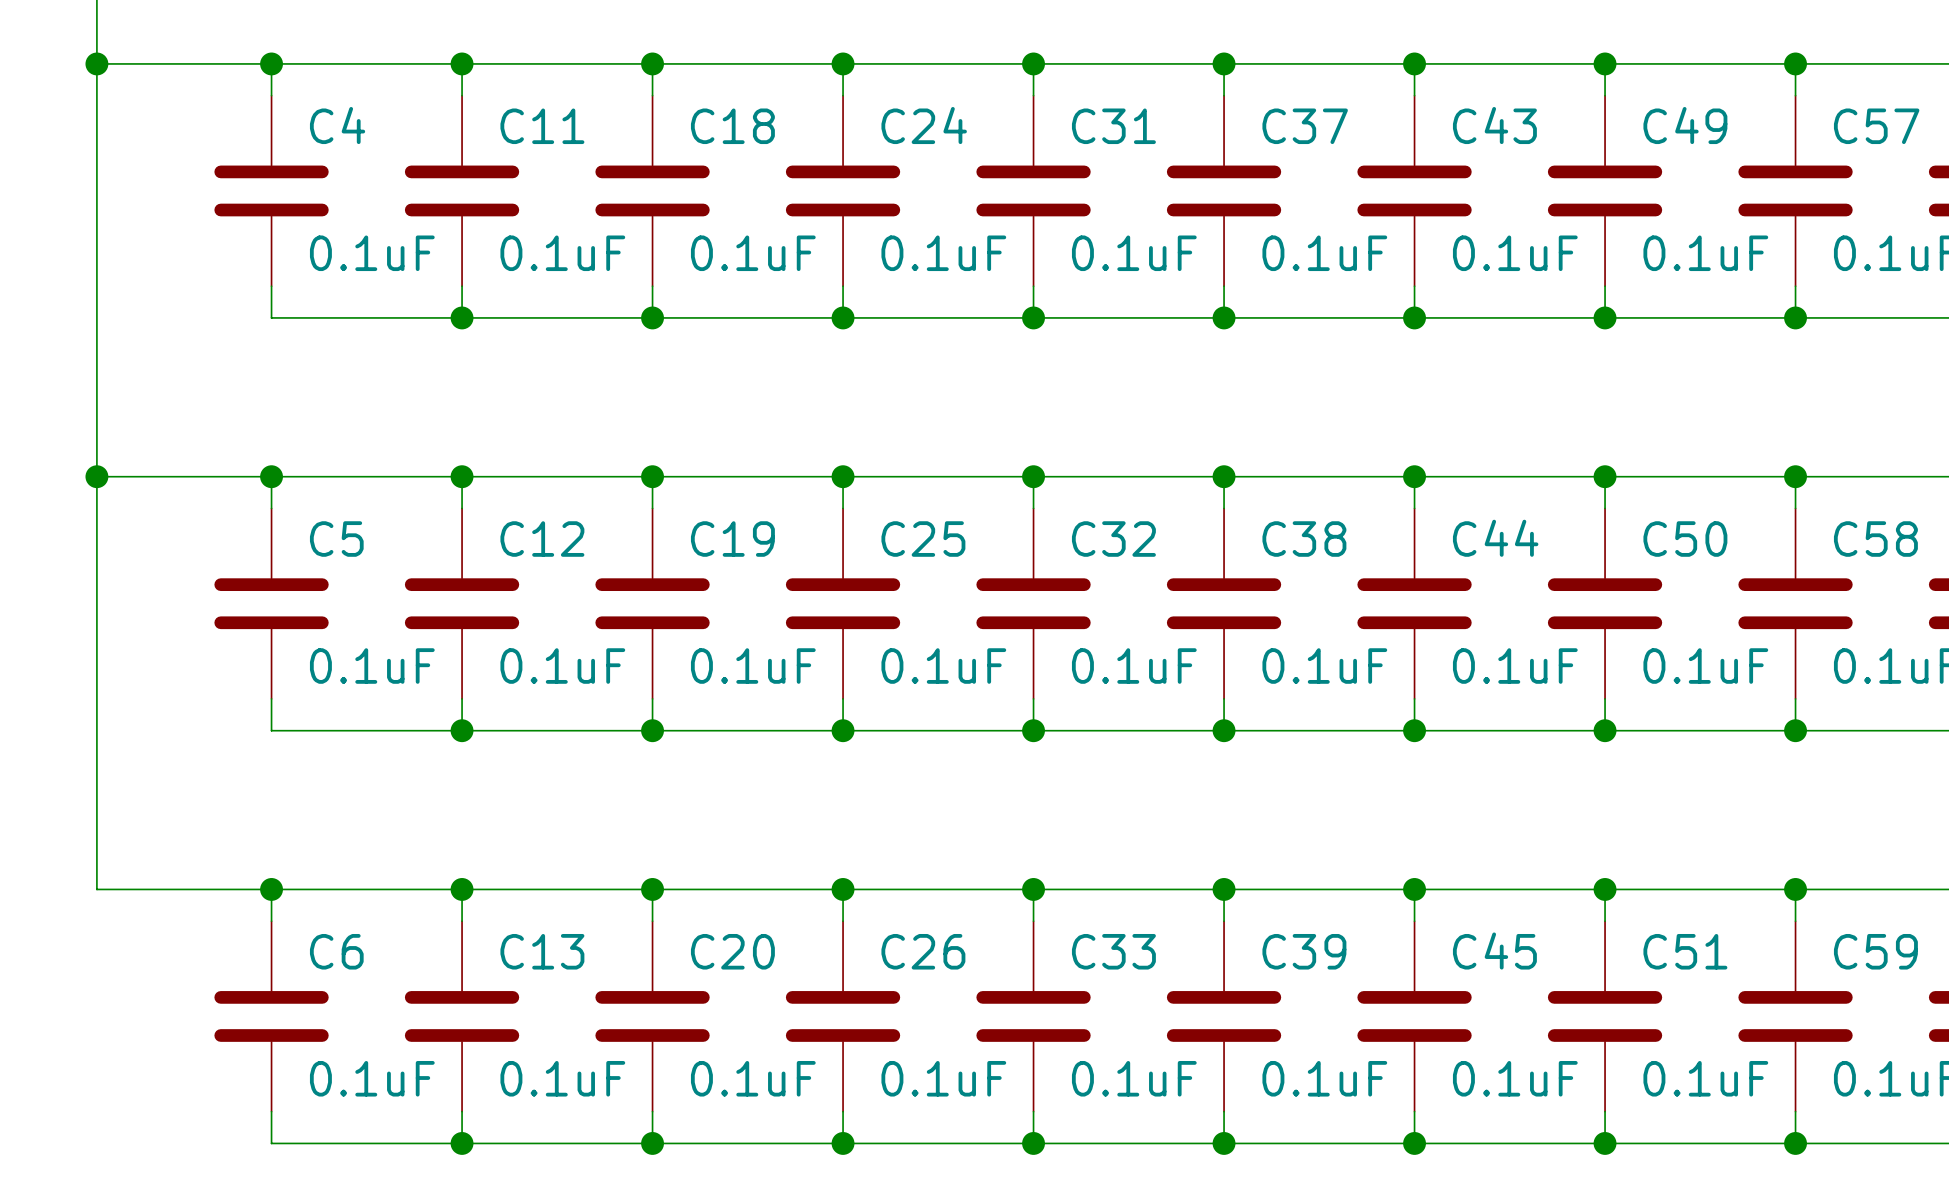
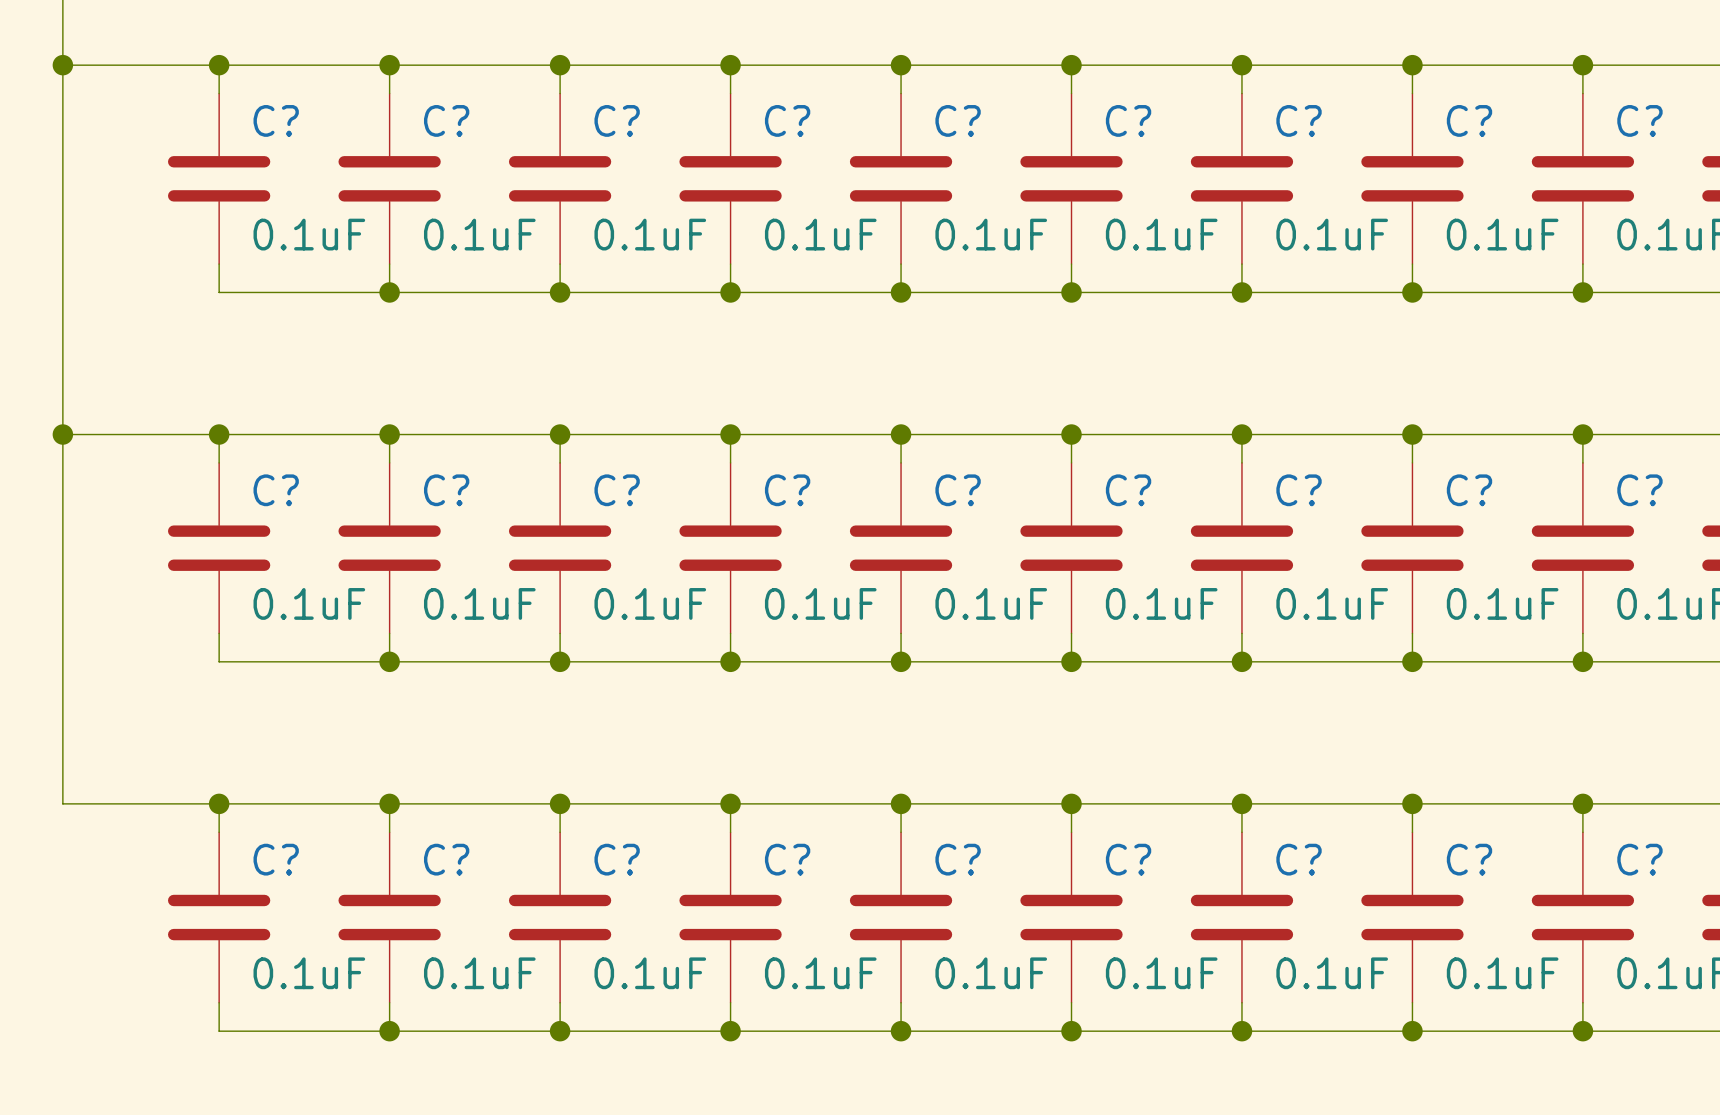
C4 name: C4 (337, 125) -> C? (276, 120)
C24 name: C24 (924, 125) -> C? (787, 120)
C43 name: C43 (1494, 125) -> C? (1299, 120)
C49 name: C49 (1685, 125) -> C? (1469, 120)
C11 name: C11 (542, 126) -> C? (446, 120)
C18 name: C18 (732, 126) -> C? (617, 120)
C31 name: C31 (1113, 126) -> C? (958, 120)
C37 name: C37 (1305, 126) -> C? (1128, 120)
C57 name: C57 (1876, 126) -> C? (1639, 120)
C44 name: C44 (1495, 538) -> C? (1299, 490)
C5 name: C5 (336, 539) -> C? (276, 490)
C12 name: C12 (542, 539) -> C? (446, 490)
C19 name: C19 (732, 539) -> C? (617, 490)
C25 name: C25 (923, 539) -> C? (787, 490)
C32 name: C32 (1113, 539) -> C? (958, 490)
C38 name: C38 (1304, 539) -> C? (1128, 490)
C50 name: C50 (1685, 539) -> C? (1469, 490)
C58 name: C58 (1875, 539) -> C? (1639, 490)
C6 name: C6 (336, 951) -> C? (276, 859)
C13 name: C13 (542, 951) -> C? (446, 859)
C20 name: C20 (732, 951) -> C? (617, 859)
C26 name: C26 (923, 951) -> C? (787, 859)
C33 name: C33 (1113, 951) -> C? (958, 859)
C39 name: C39 (1304, 951) -> C? (1128, 859)
C45 name: C45 (1494, 951) -> C? (1299, 859)
C51 name: C51 (1685, 951) -> C? (1469, 859)
C59 name: C59 (1875, 951) -> C? (1639, 859)

